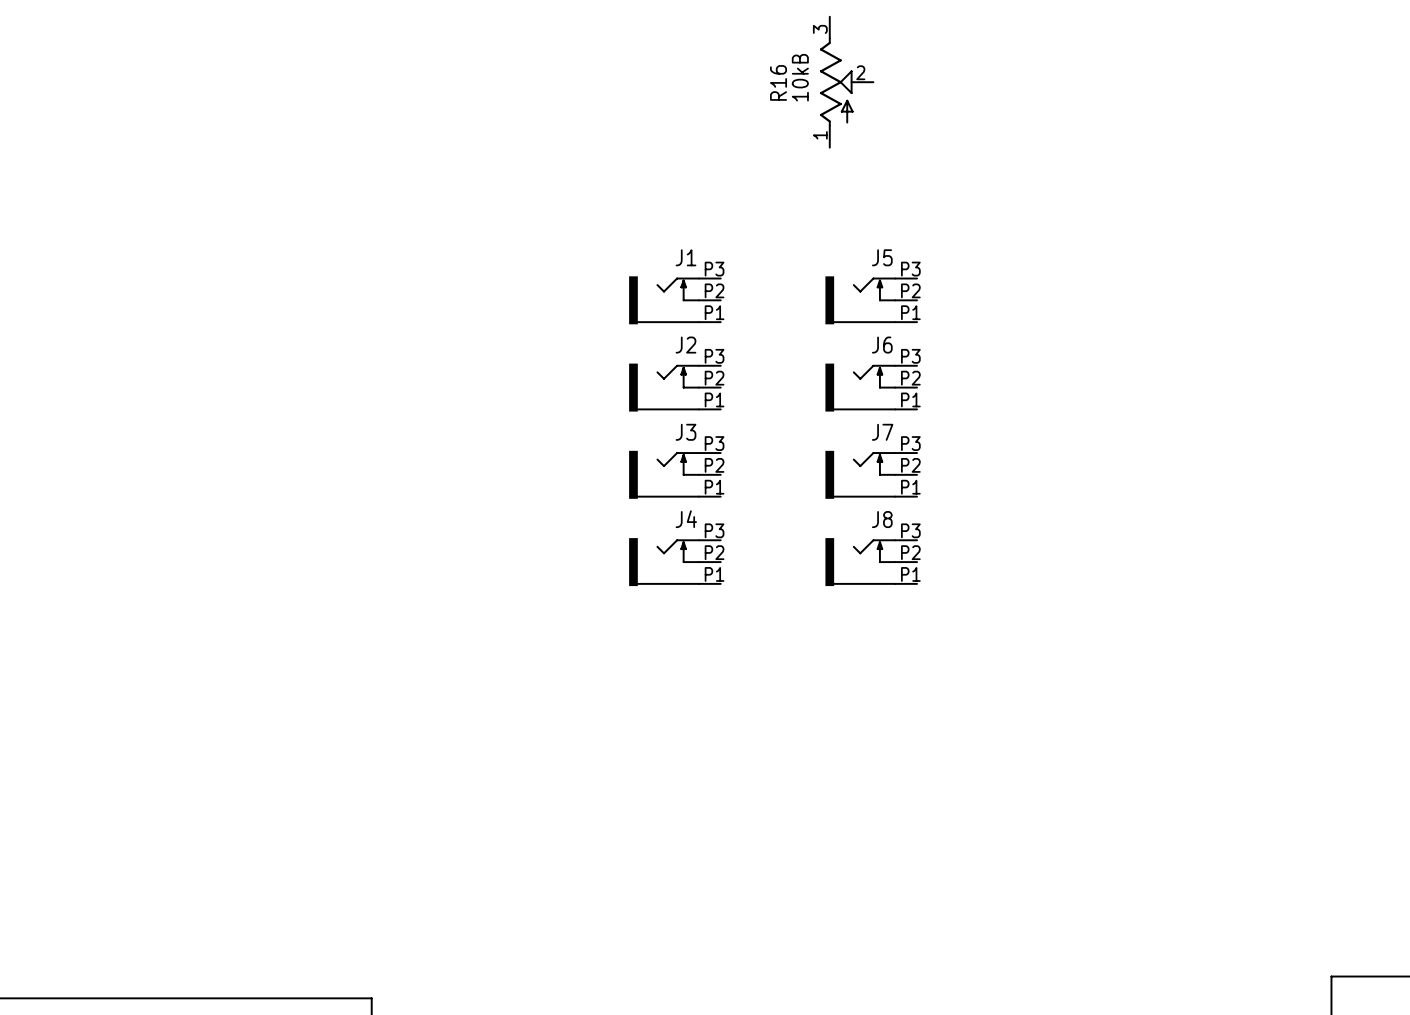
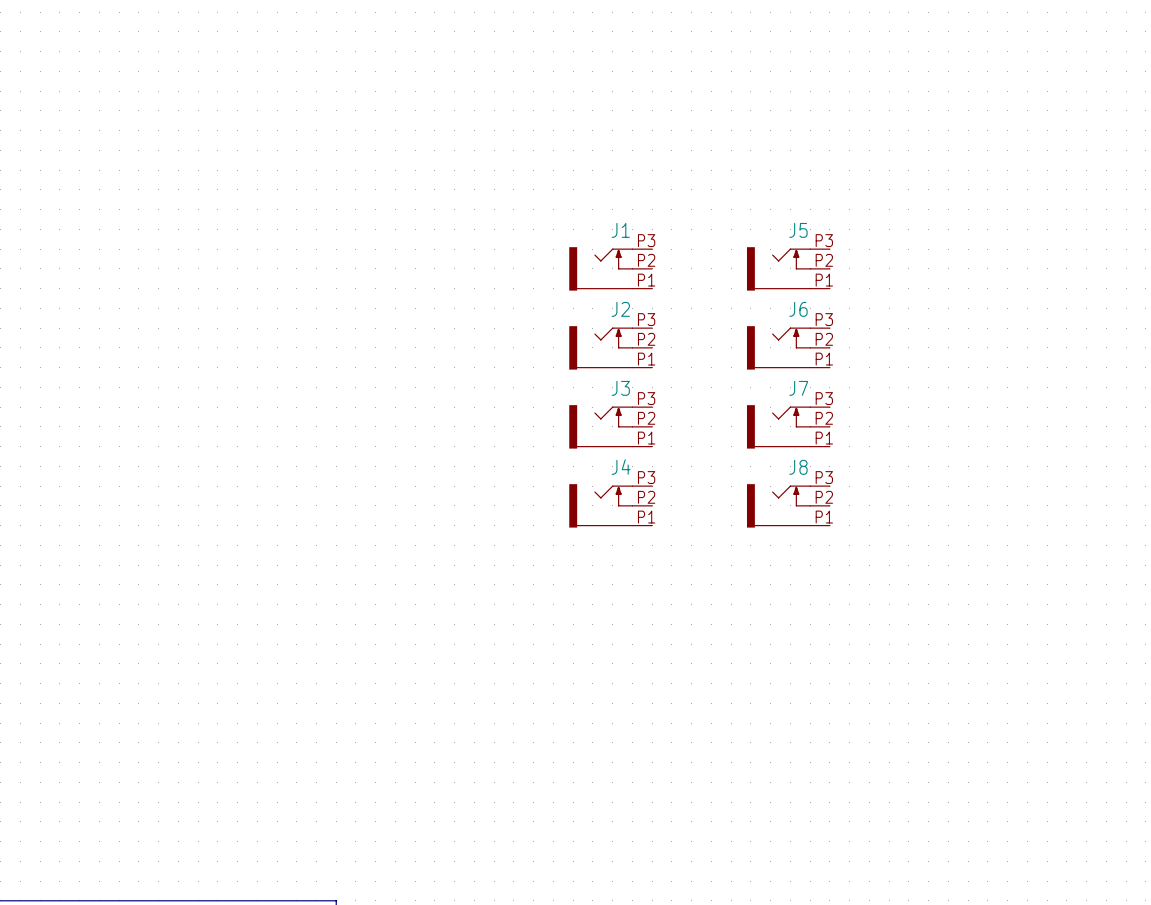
R16: 10kB (846, 82) -> none

